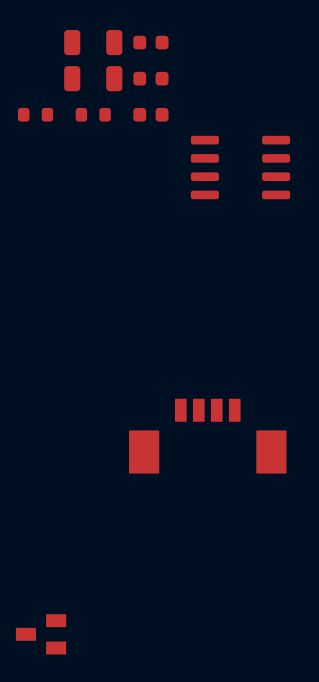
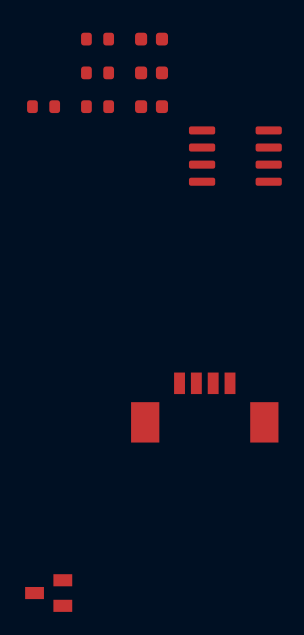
part footprint: [64, 29, 123, 56] -> [81, 32, 115, 46]
part footprint: [64, 66, 123, 92] -> [81, 66, 115, 80]

